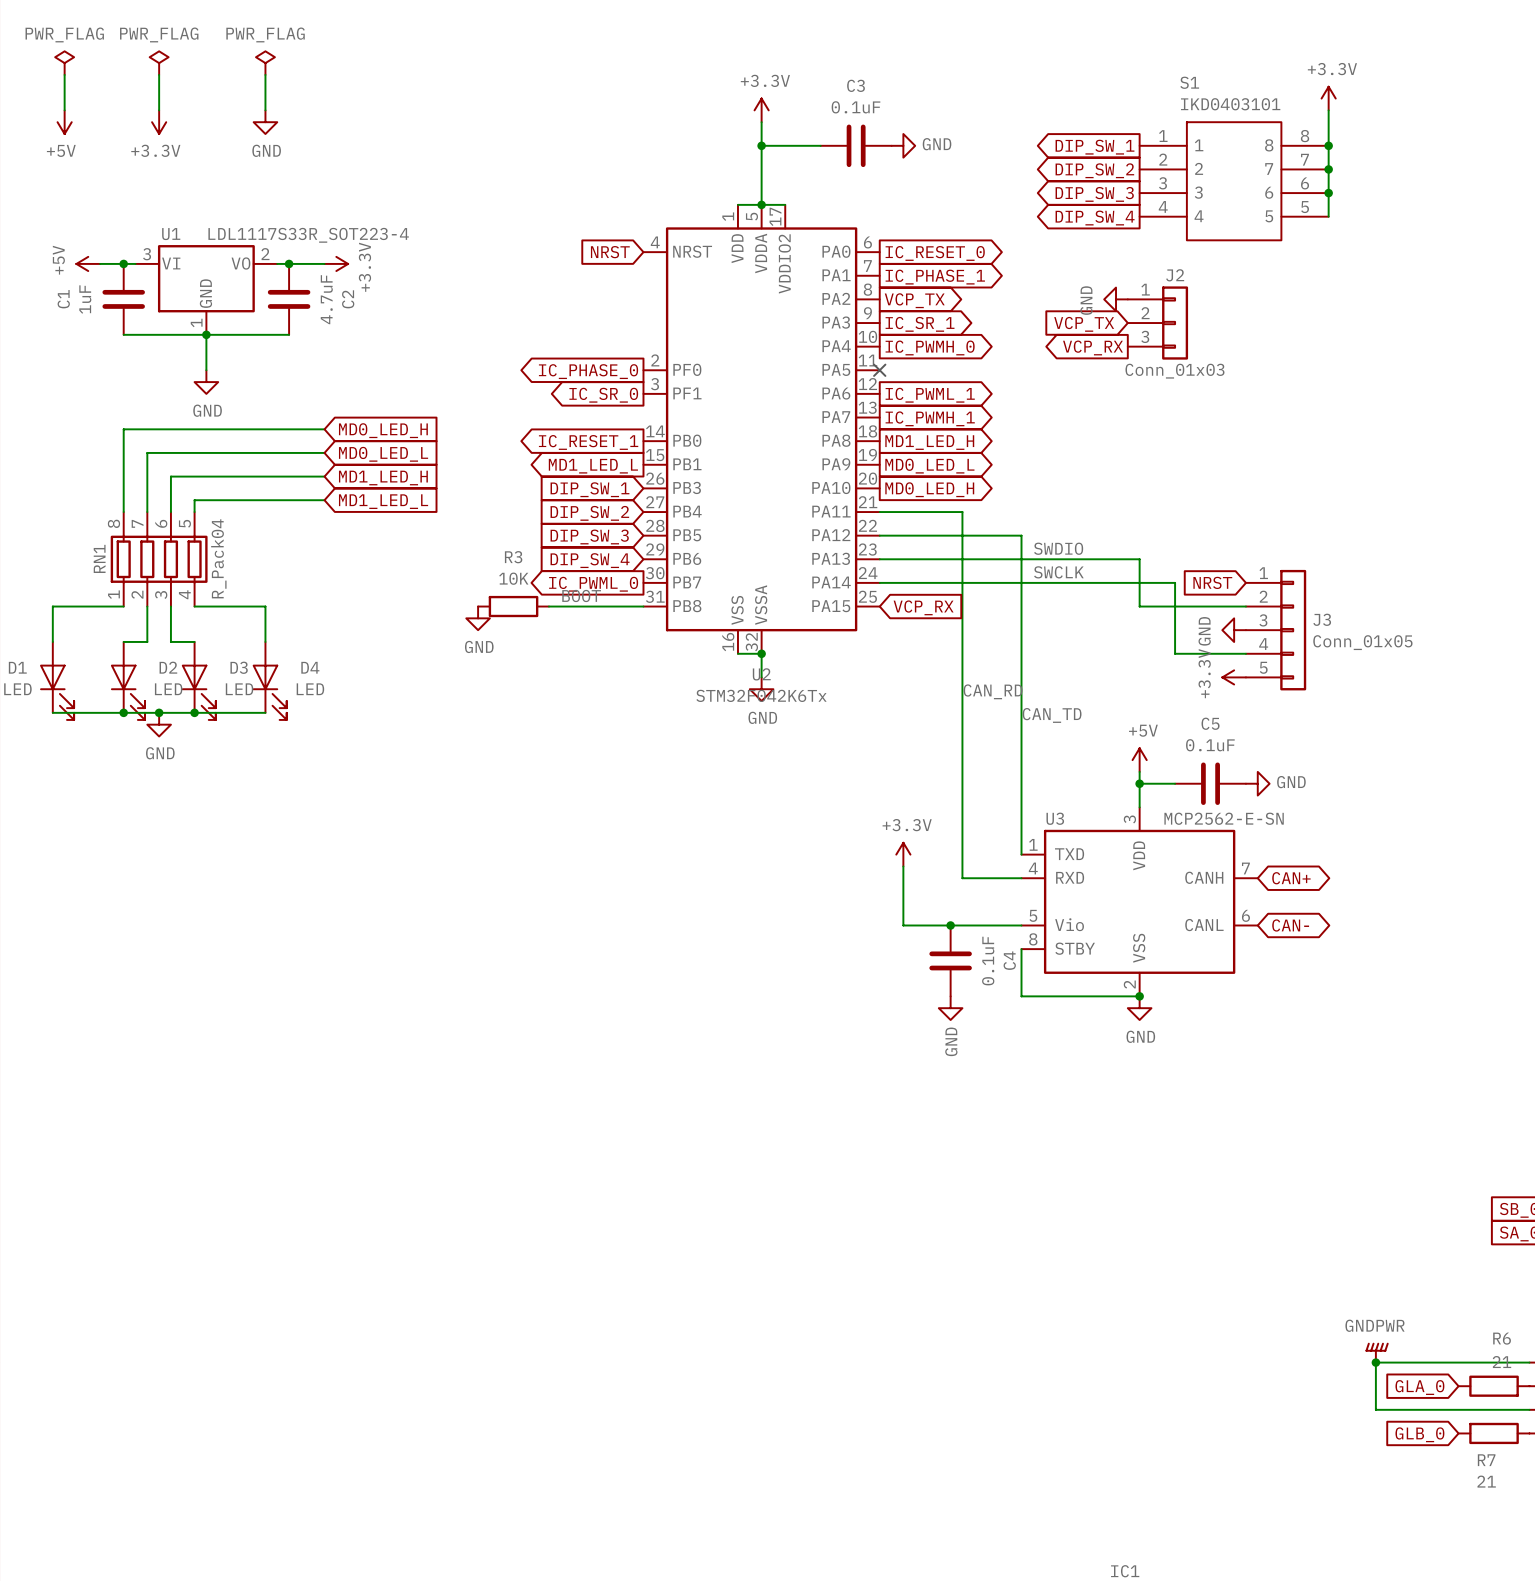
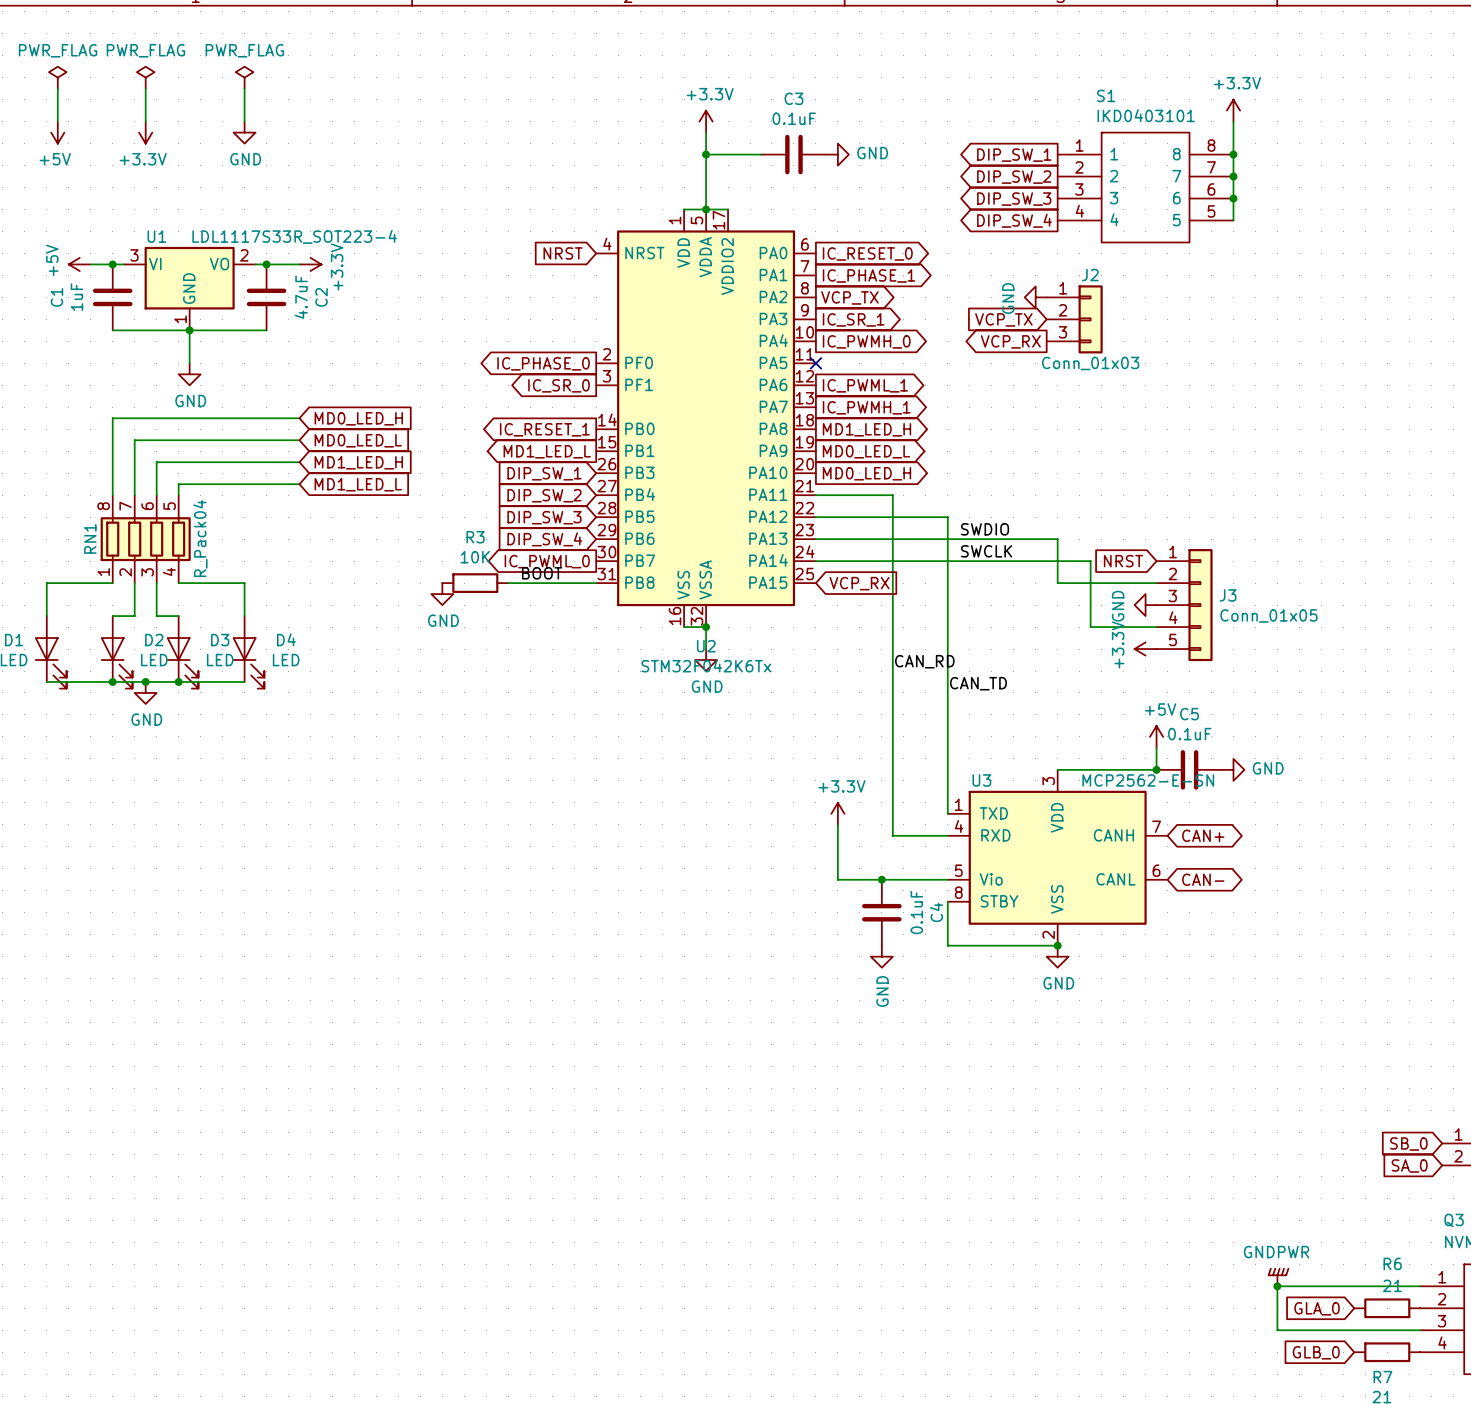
power symbol position: +5V (1139, 760) -> +5V (1156, 736)
wire: (1139, 771) (1139, 807) -> (1156, 747) (1156, 769) (1057, 769)
wire: (1139, 783) (1175, 783) -> none
junction: (1139, 783) -> none
C5 position: (1210, 783) -> (1189, 769)
power symbol position: GND (1257, 783) -> GND (1233, 769)
junction: none -> (1156, 769)

